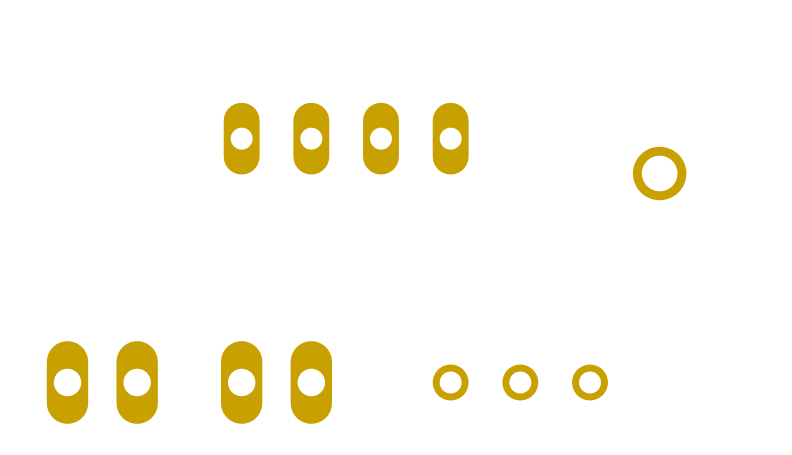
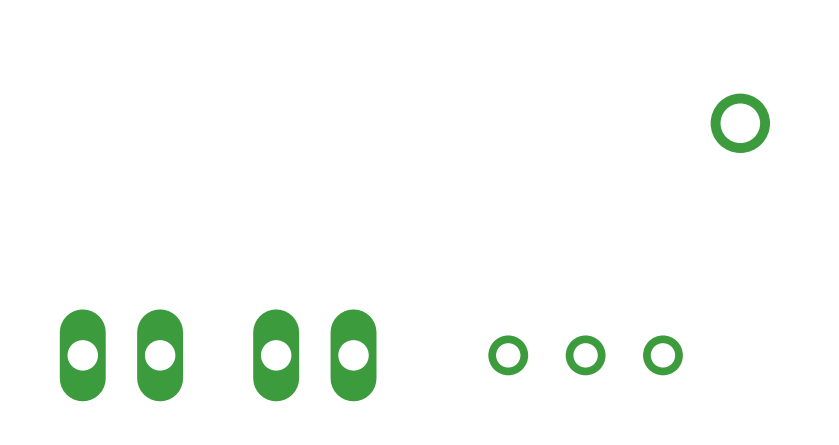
part: (346, 138) -> none

